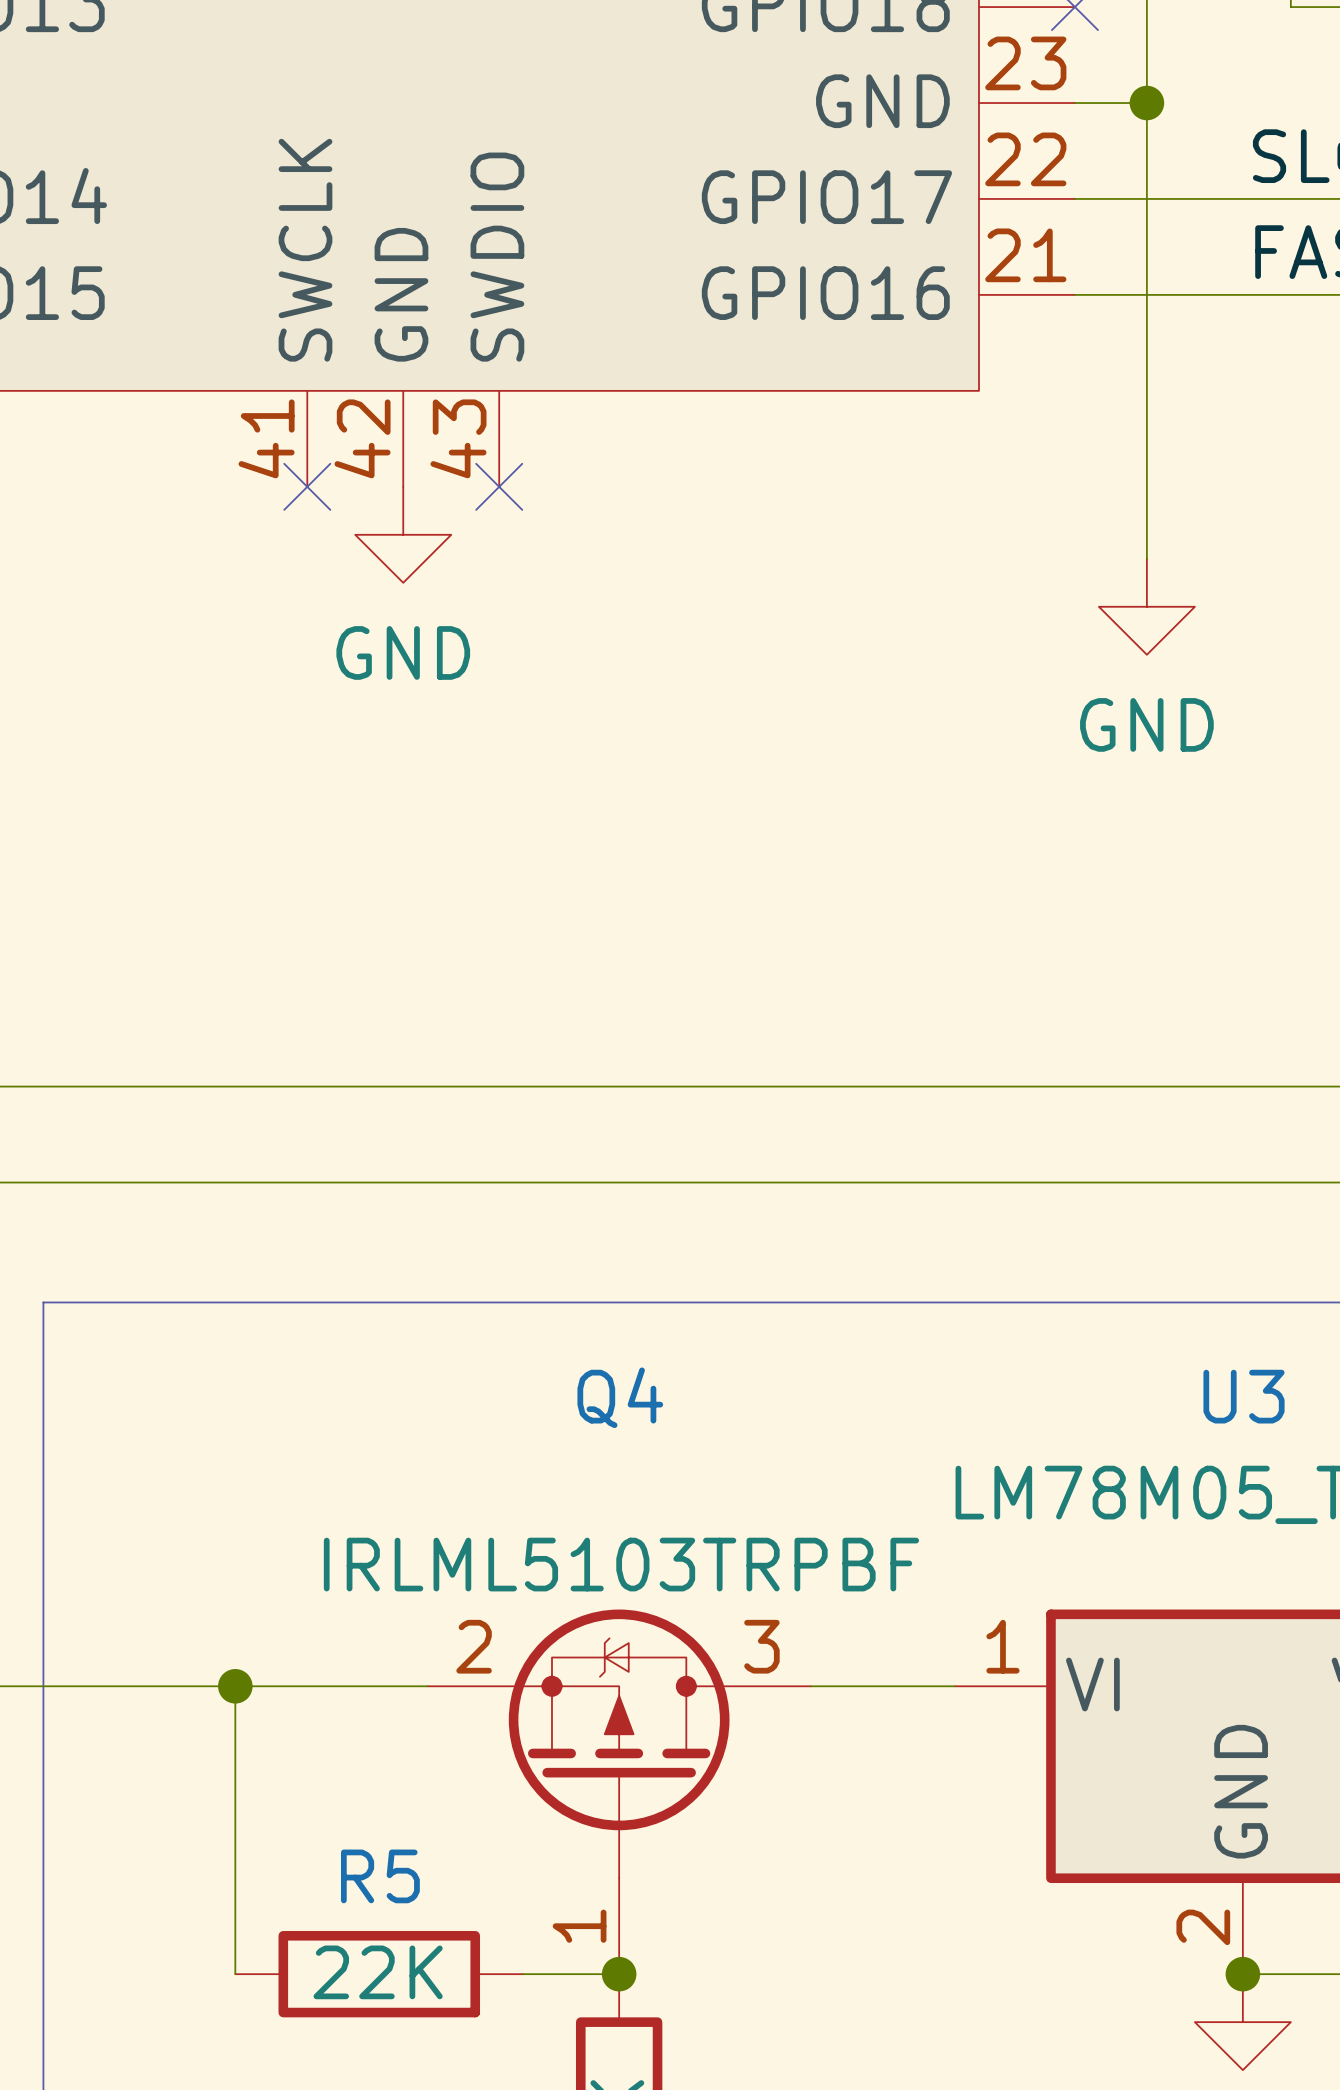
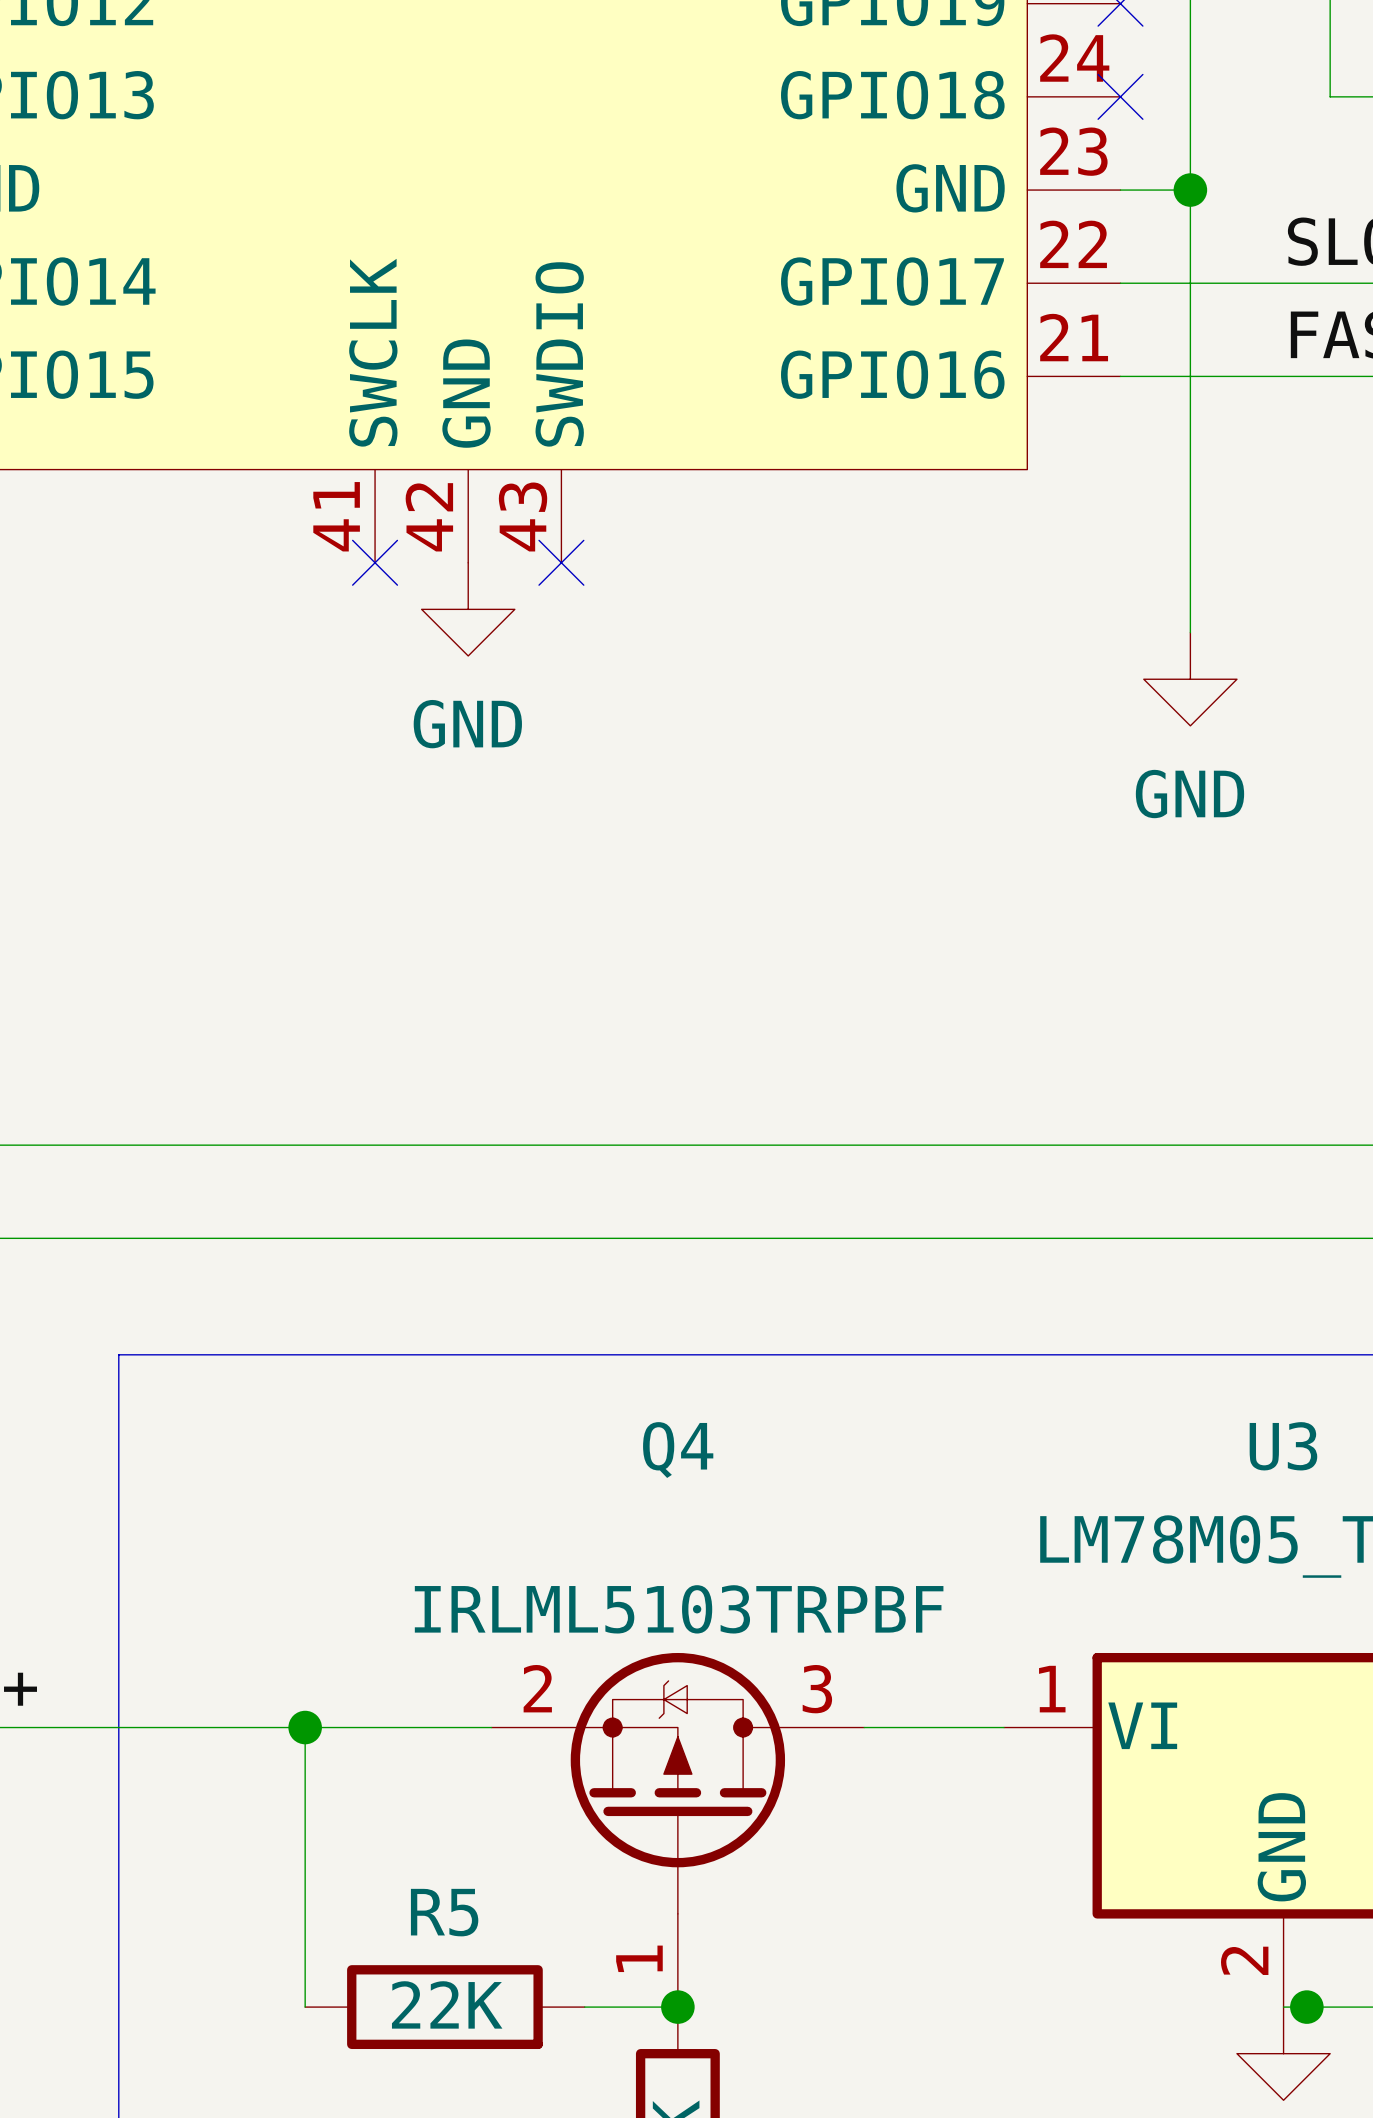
junction position: (1242, 1974) -> (1306, 2007)

